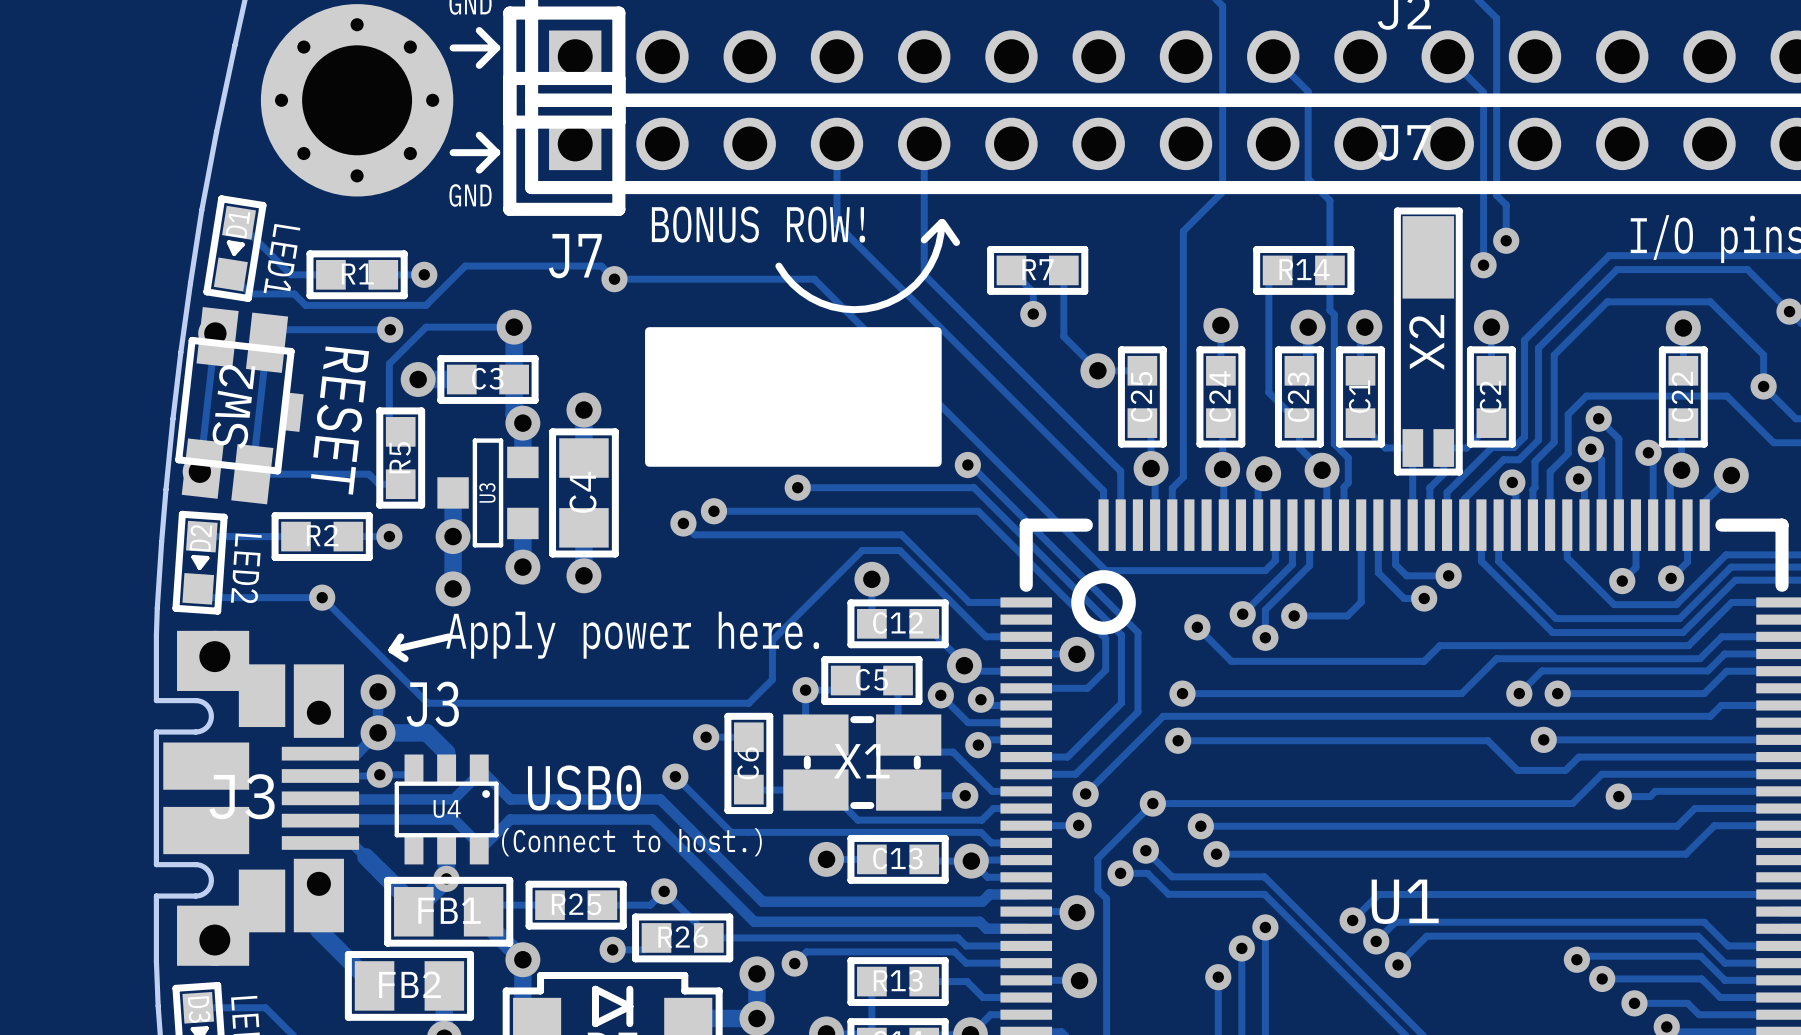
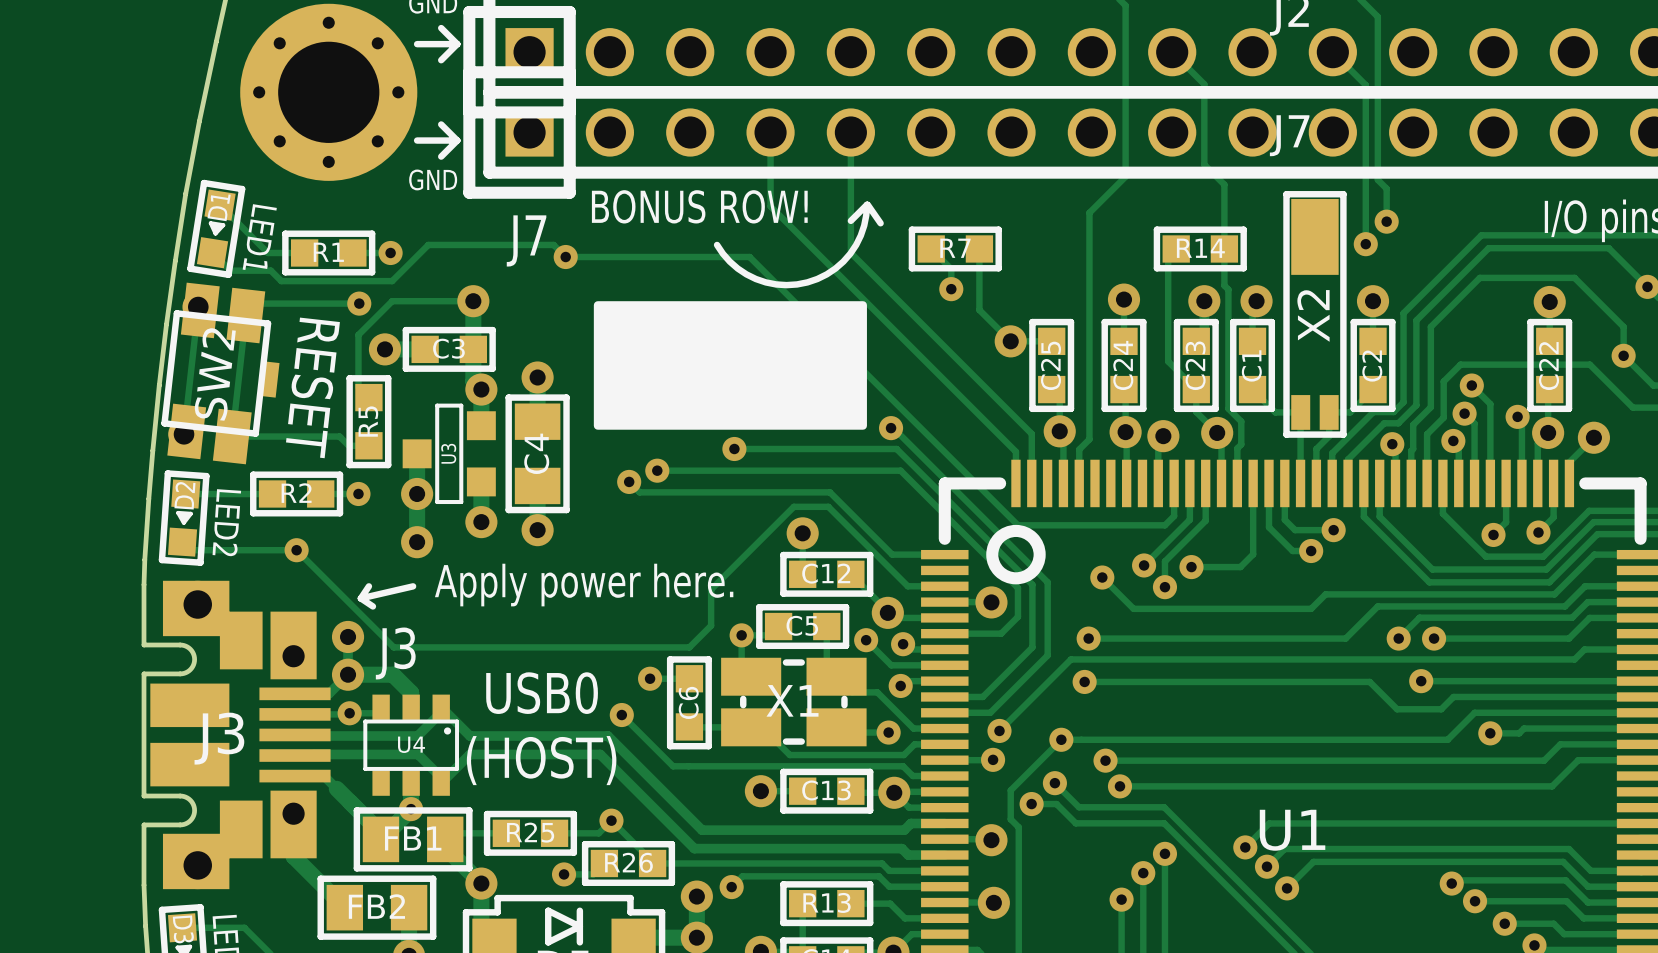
text position: USB0 (584, 787) -> USB0 (542, 693)
text: none -> (HOST) (541, 760)
text: (Connect to host.) (631, 842) -> none

